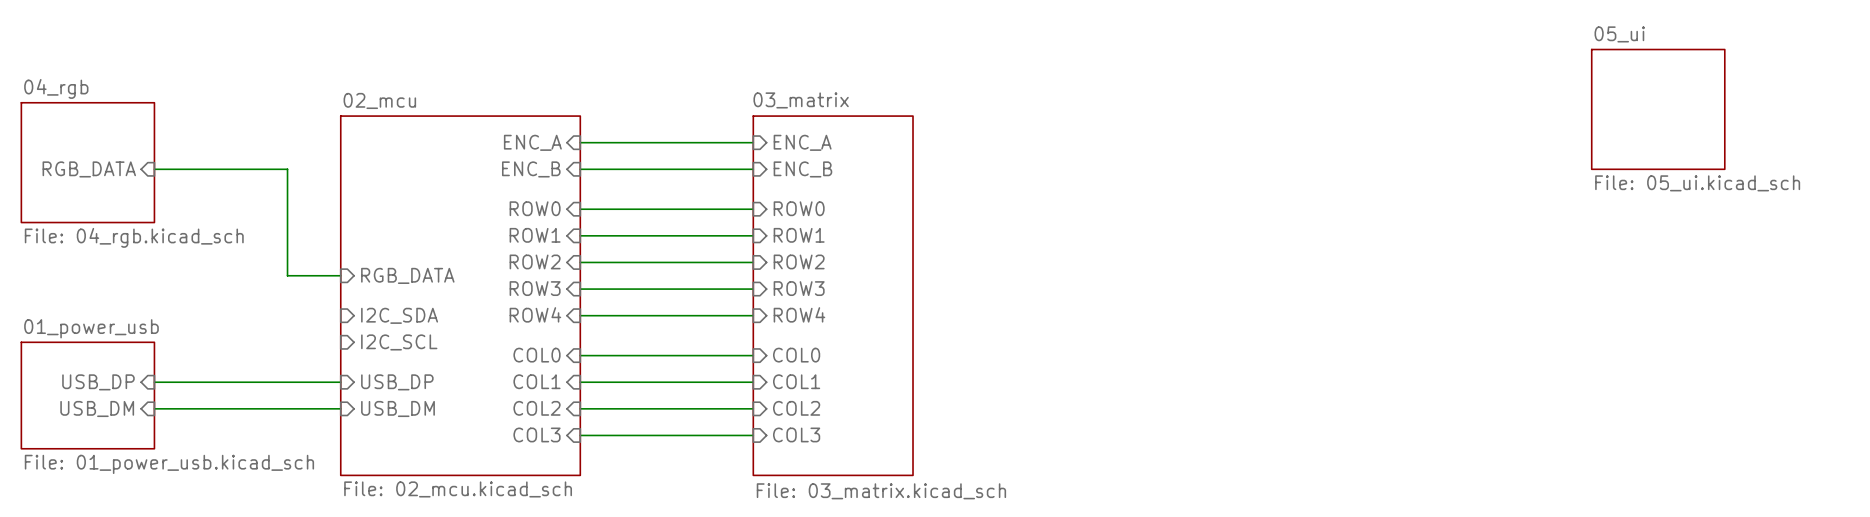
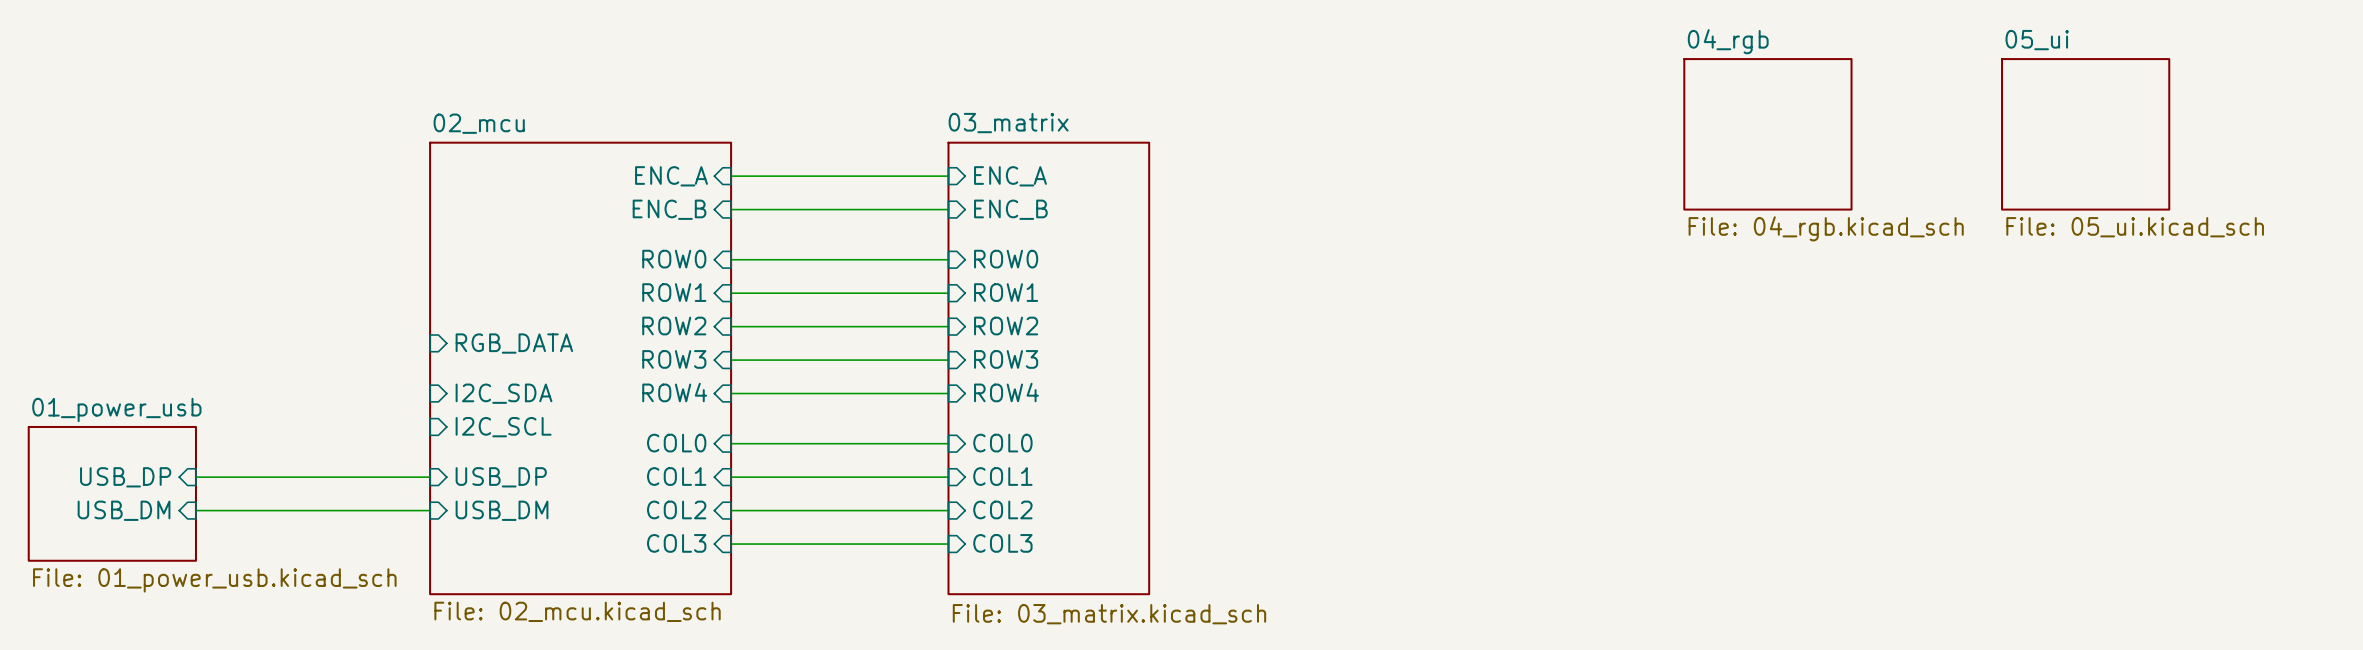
sheet 04_rgb position: (87, 162) -> (1767, 134)
sheet pin: RGB_DATA (89, 169) -> none
wire: (154, 169) (287, 169) (287, 275) (340, 275) -> none

